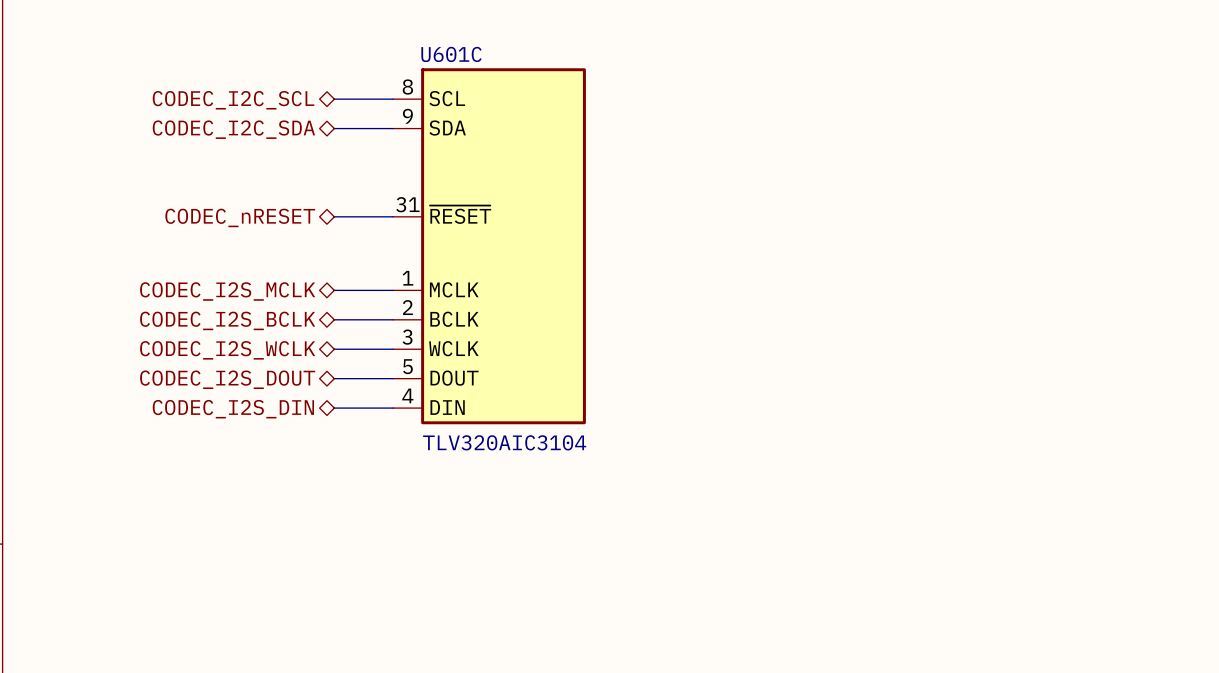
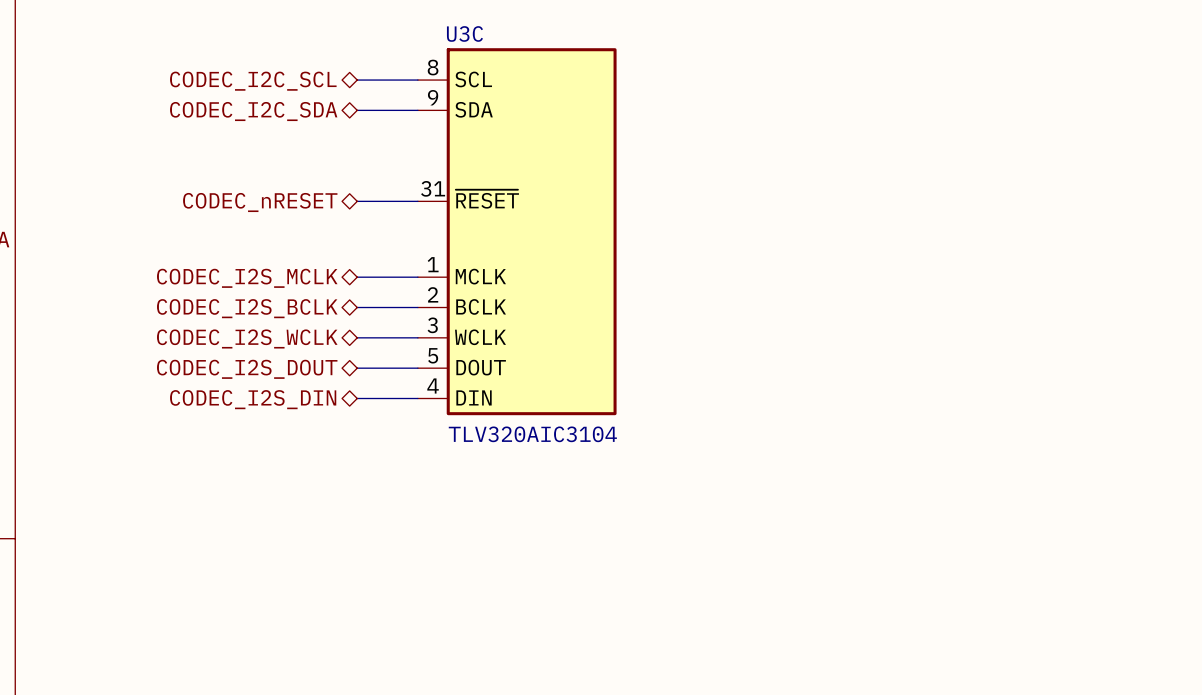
U601C name: U601C (451, 54) -> U3C (464, 33)

